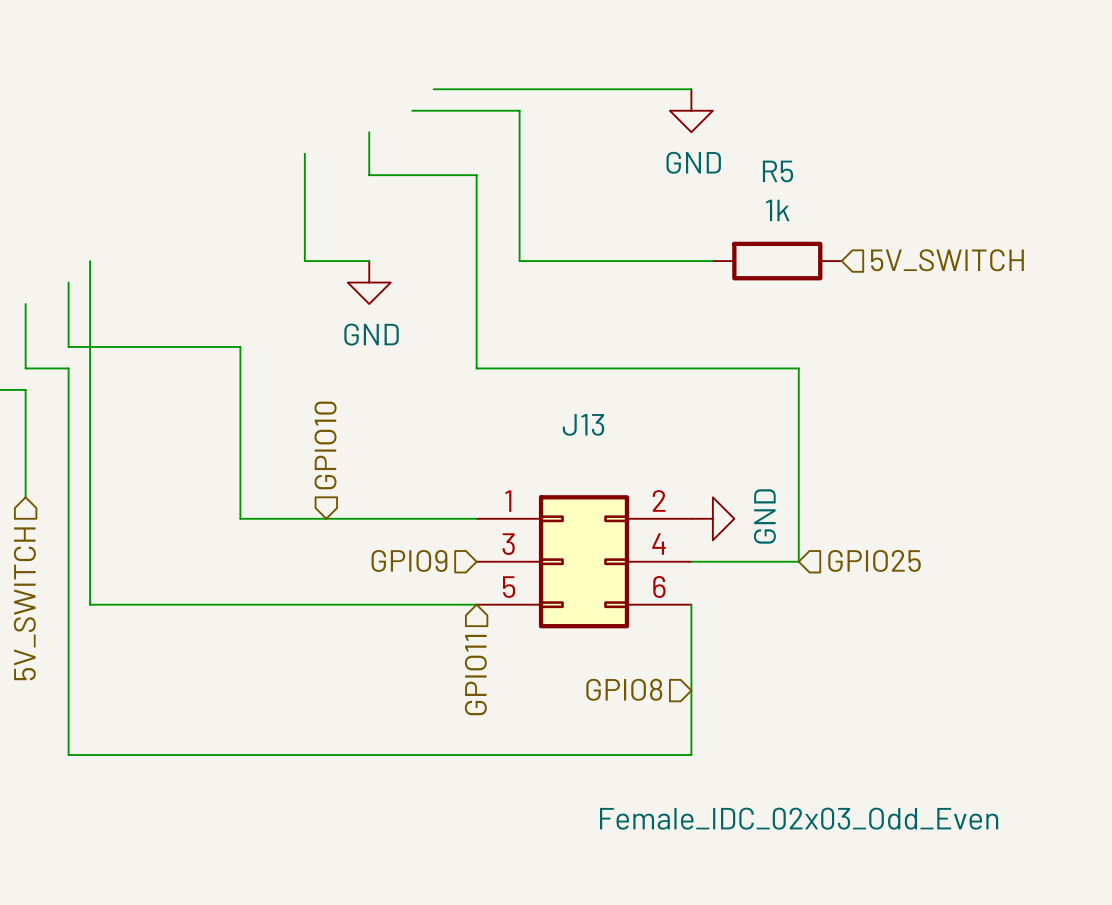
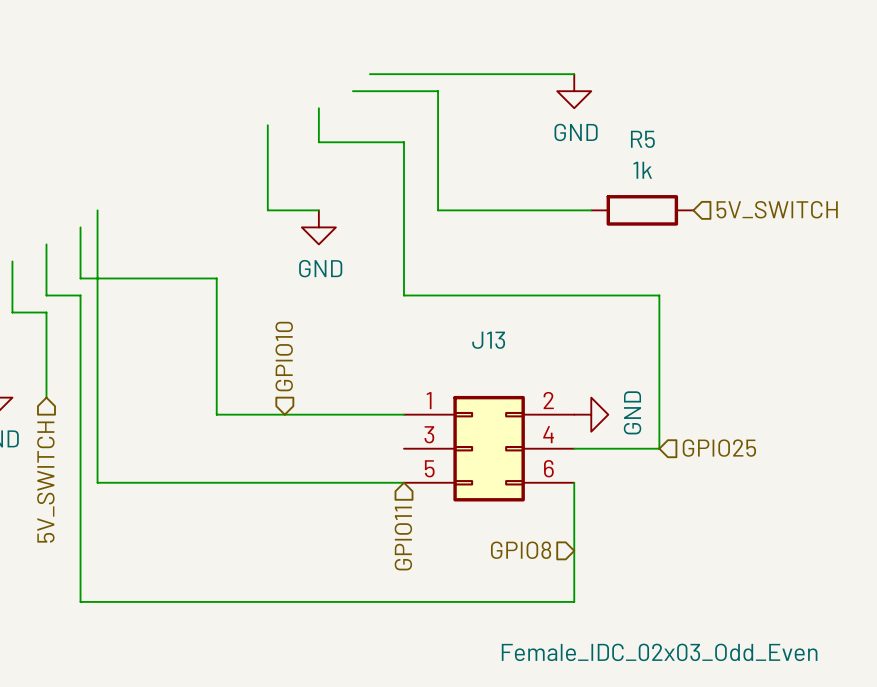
hierarchical label: GPIO9 (409, 560) -> none

